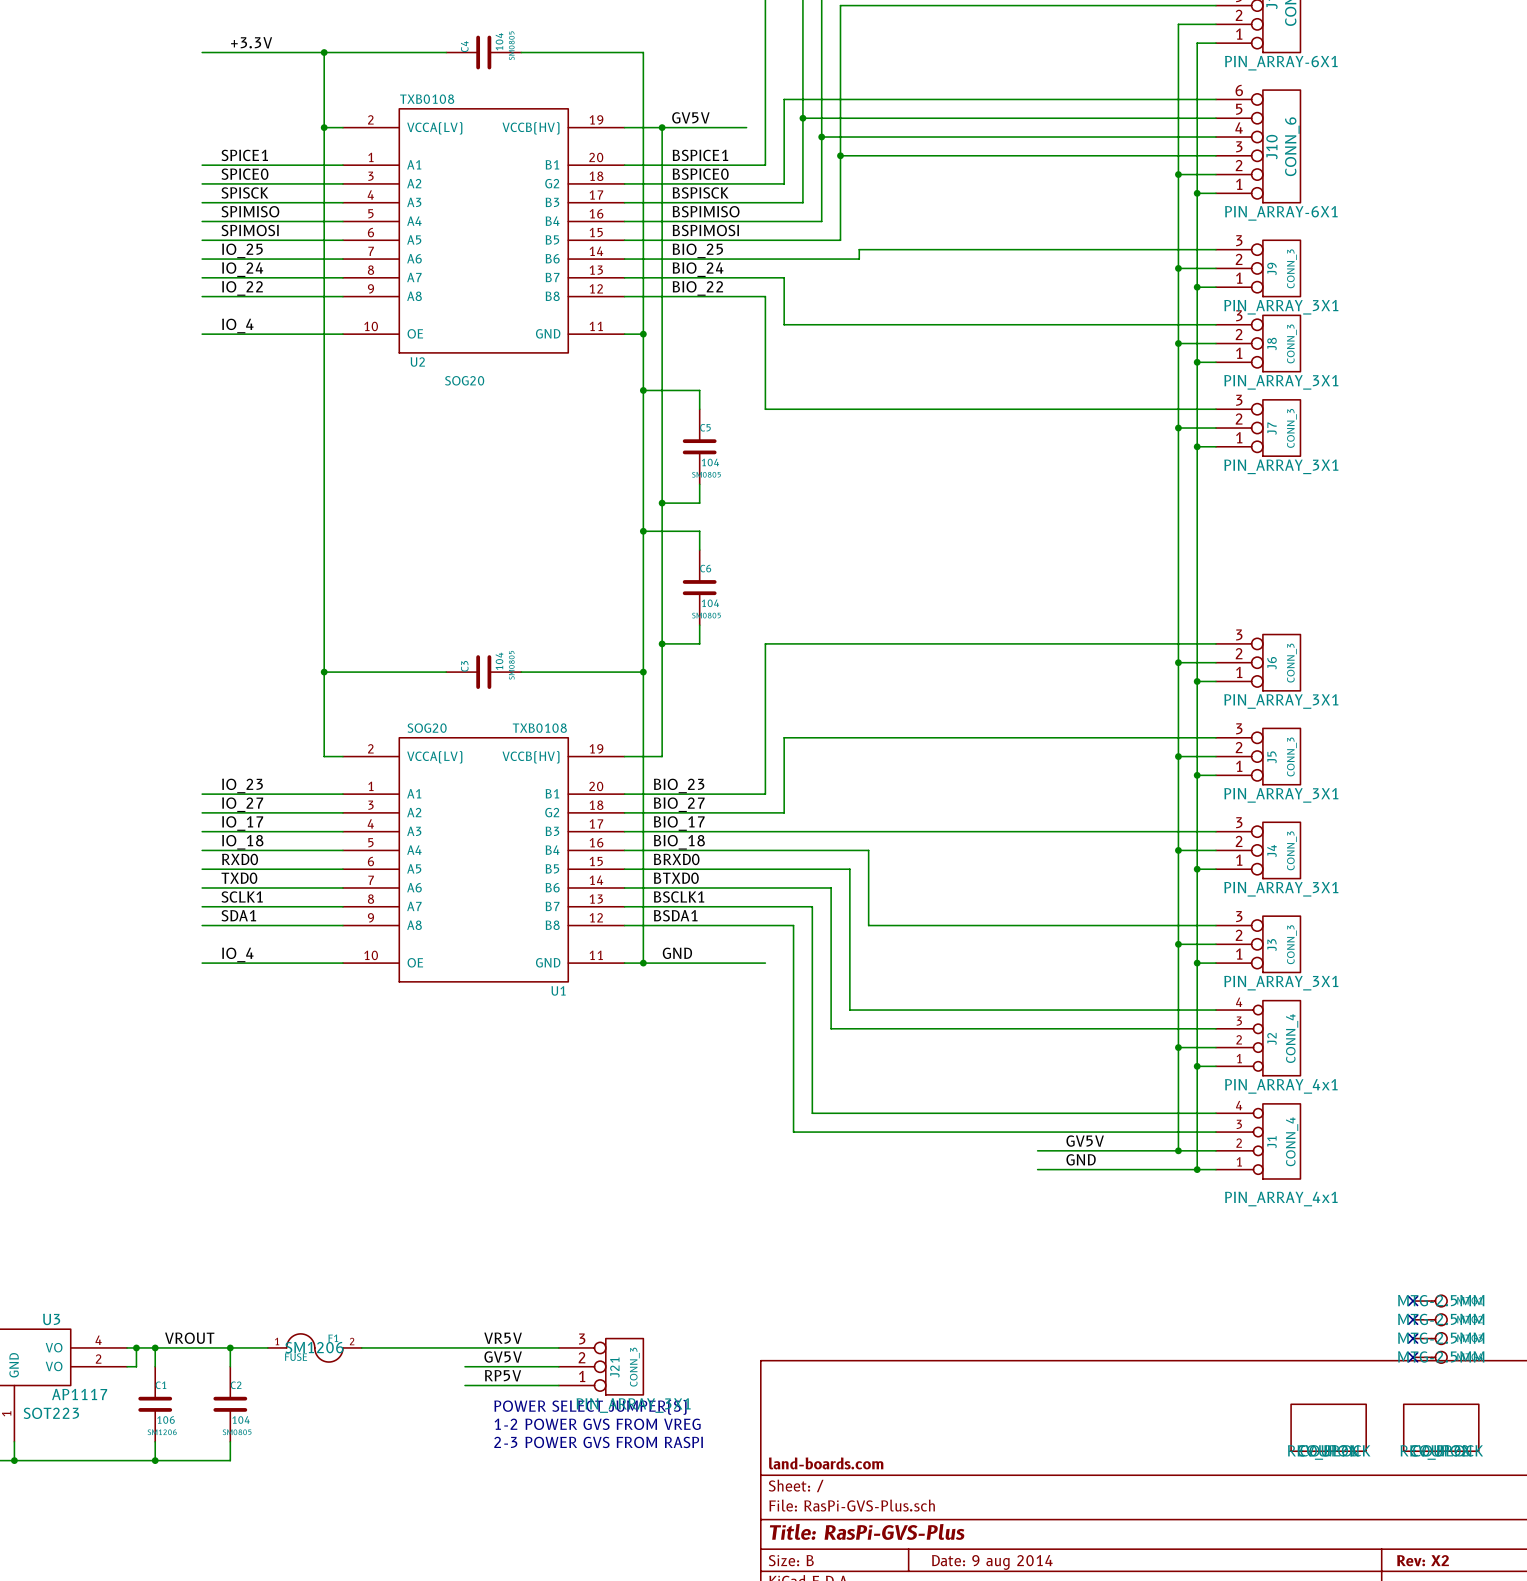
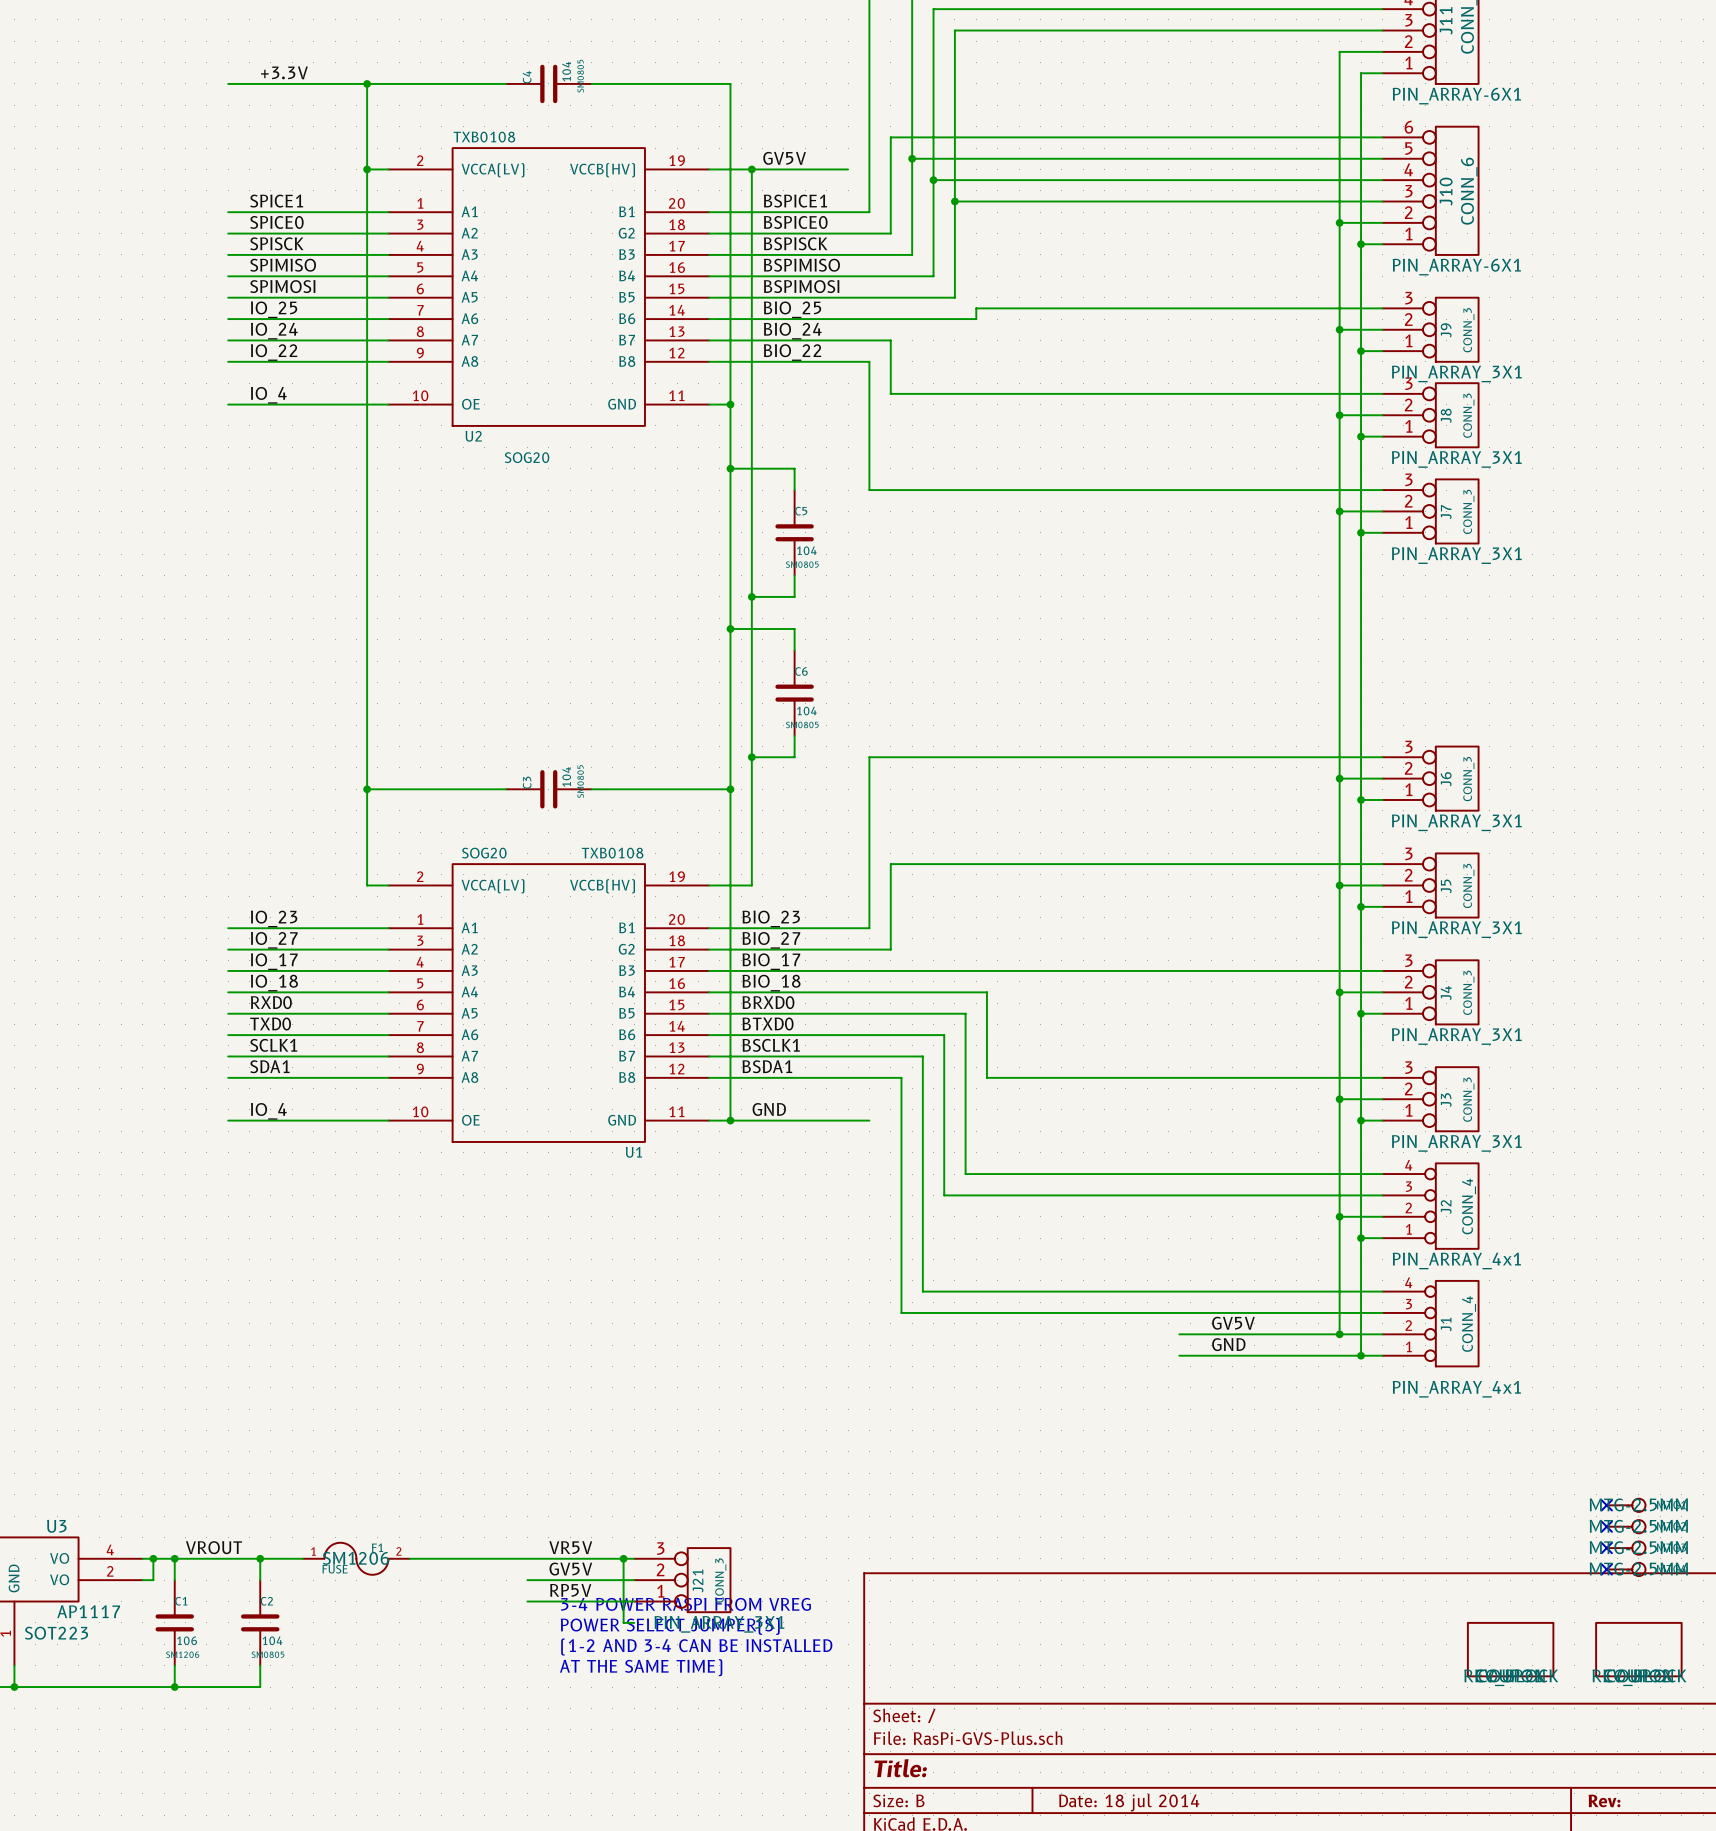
wire: none -> (623, 1558) (623, 1622) (634, 1622)
junction: none -> (623, 1558)
text: none -> 3-4 POWER RASPI FROM VREG (686, 1604)
text: 1-2 POWER GVS FROM VREG (597, 1424) -> (1-2 AND 3-4 CAN BE INSTALLED (696, 1647)
text: 2-3 POWER GVS FROM RASPI (598, 1442) -> AT THE SAME TIME) (641, 1667)
title block: land-boards.com (826, 1463) -> none
title block: Title: RasPi-GVS-Plus (867, 1531) -> Title: (900, 1768)
title block: Rev: X2 (1423, 1560) -> Rev: (1604, 1800)
title block: Date: 9 aug 2014 (992, 1562) -> Date: 18 jul 2014 (1129, 1802)

